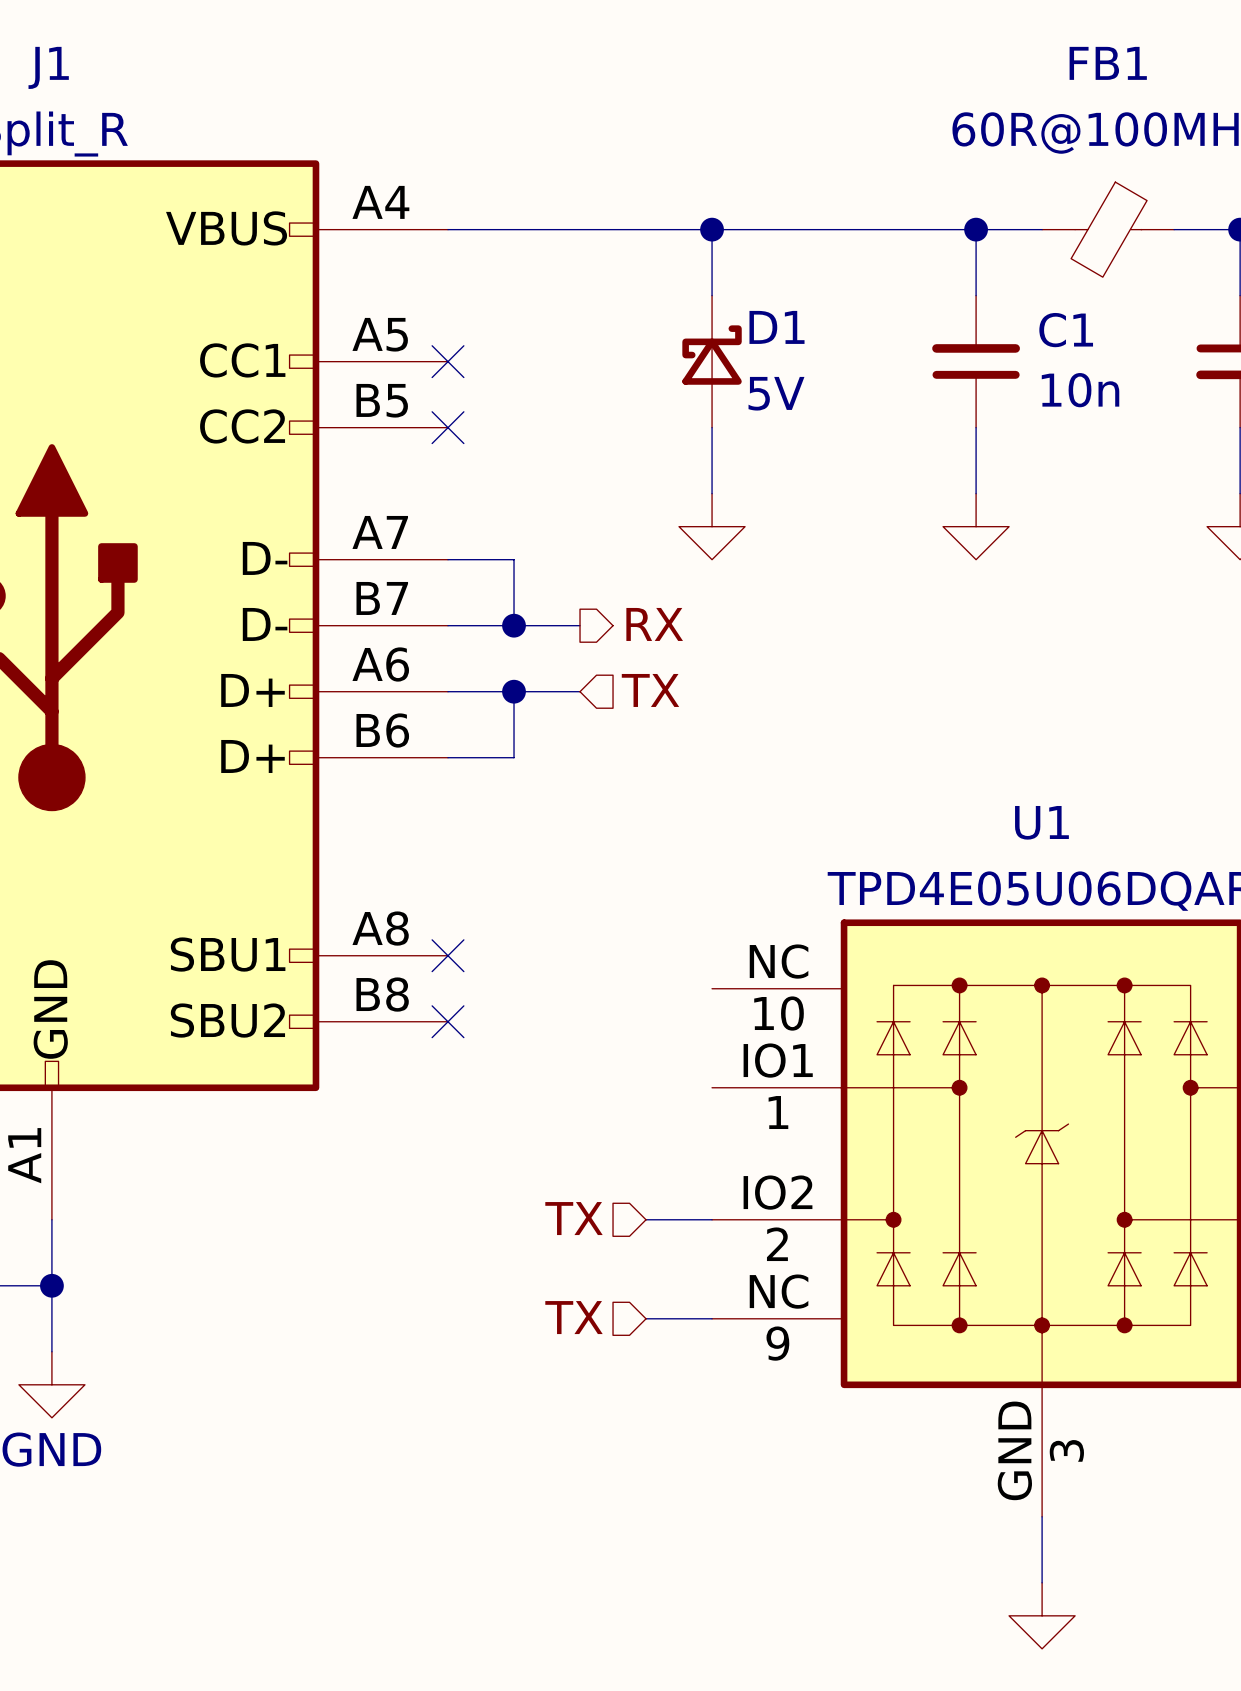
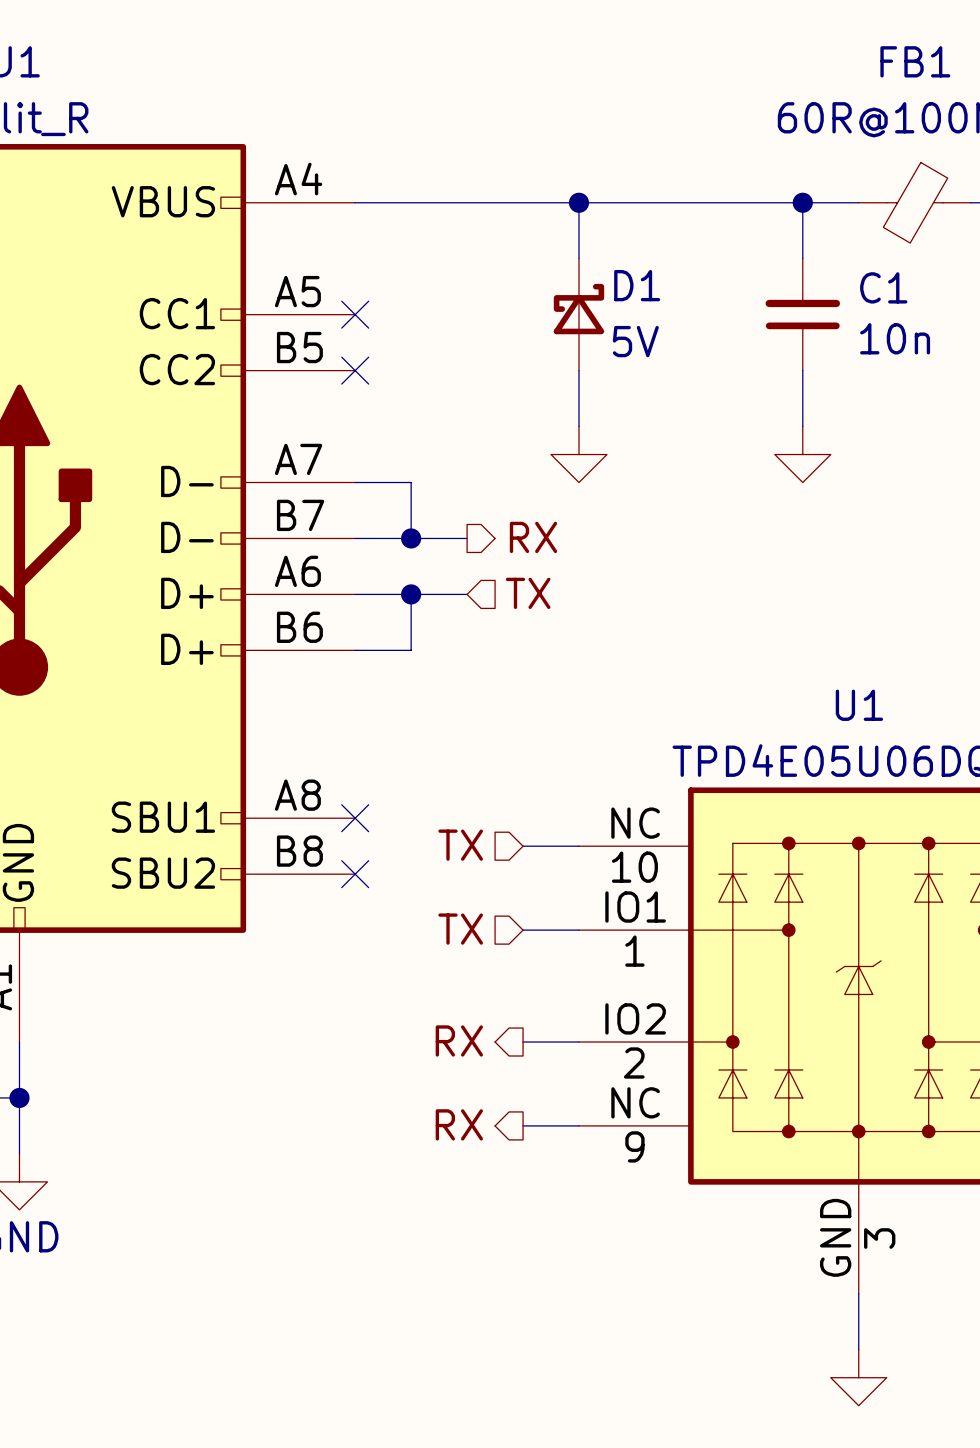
hierarchical label: none -> TX (460, 845)
wire: none -> (523, 846) (578, 846)
hierarchical label: none -> TX (460, 929)
wire: none -> (523, 930) (578, 930)
hierarchical label shape: input (574, 1218) -> output (459, 1040)
hierarchical label: TX (574, 1218) -> RX (459, 1040)
hierarchical label shape: input (574, 1317) -> output (459, 1124)
hierarchical label: TX (574, 1317) -> RX (459, 1124)

